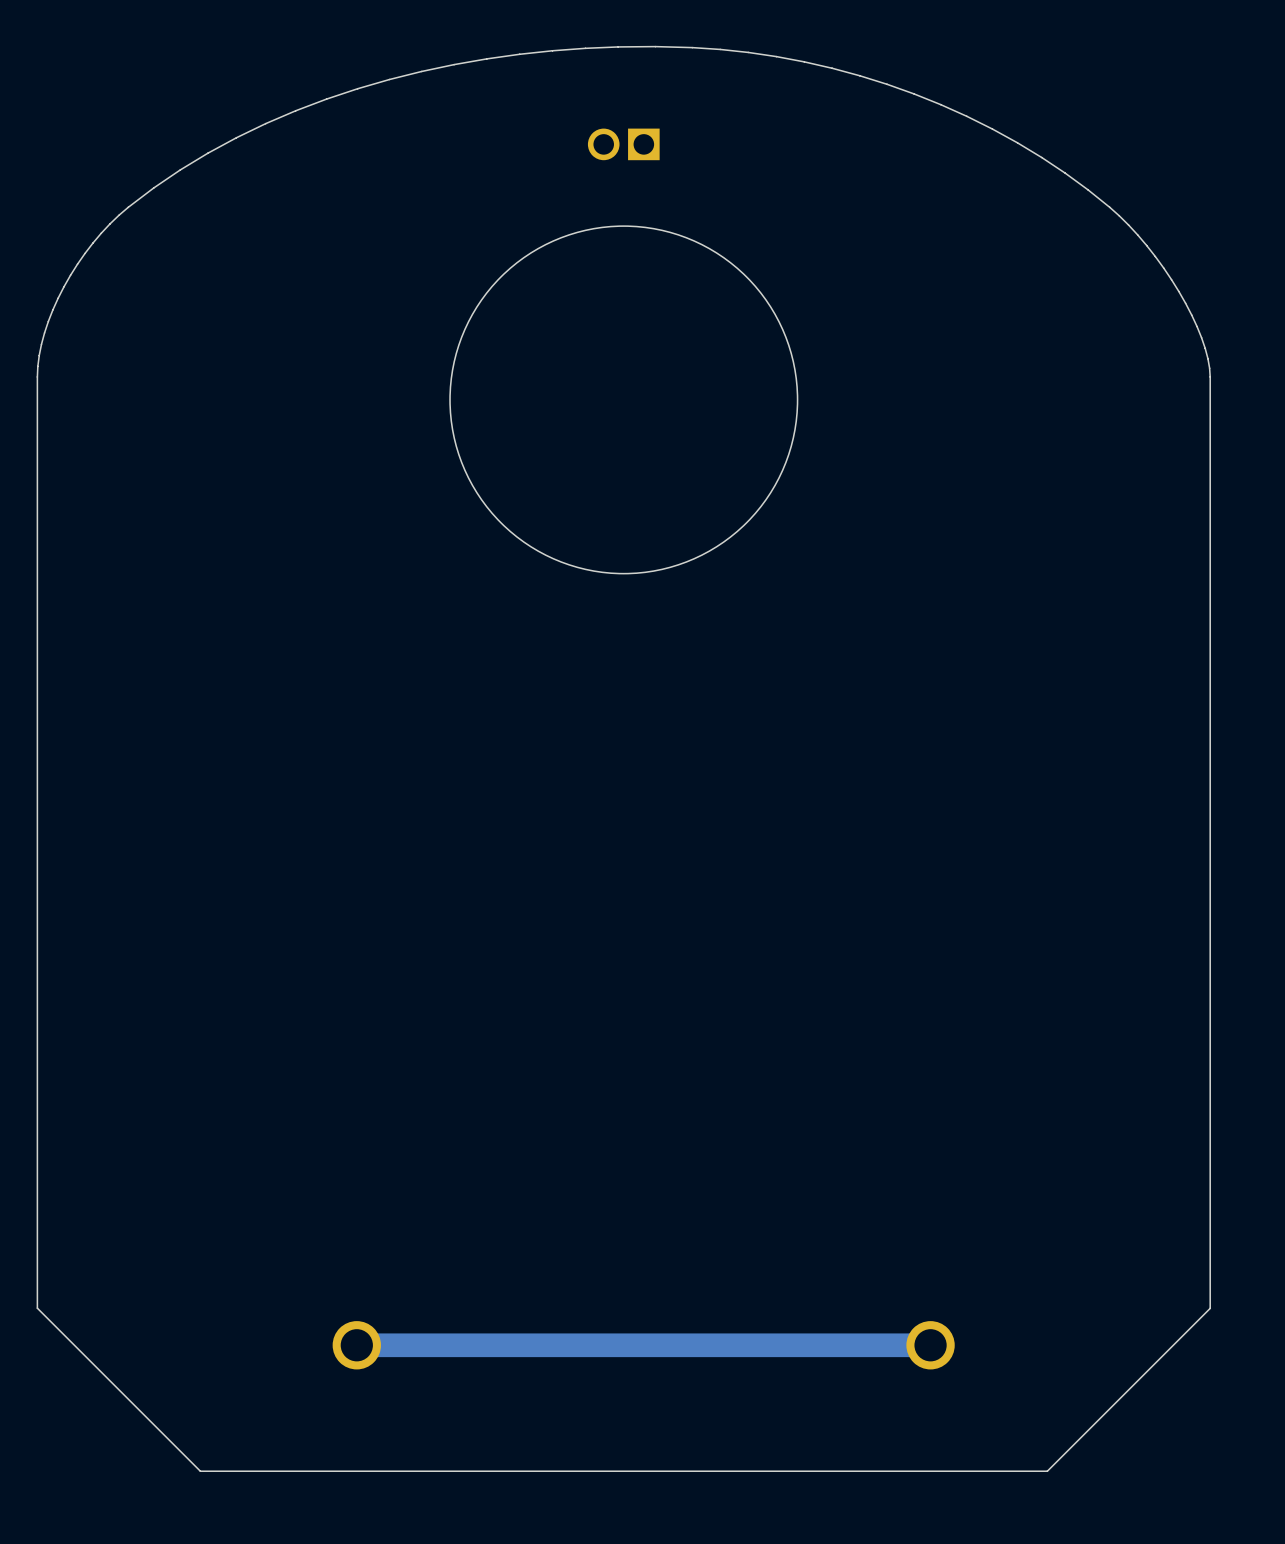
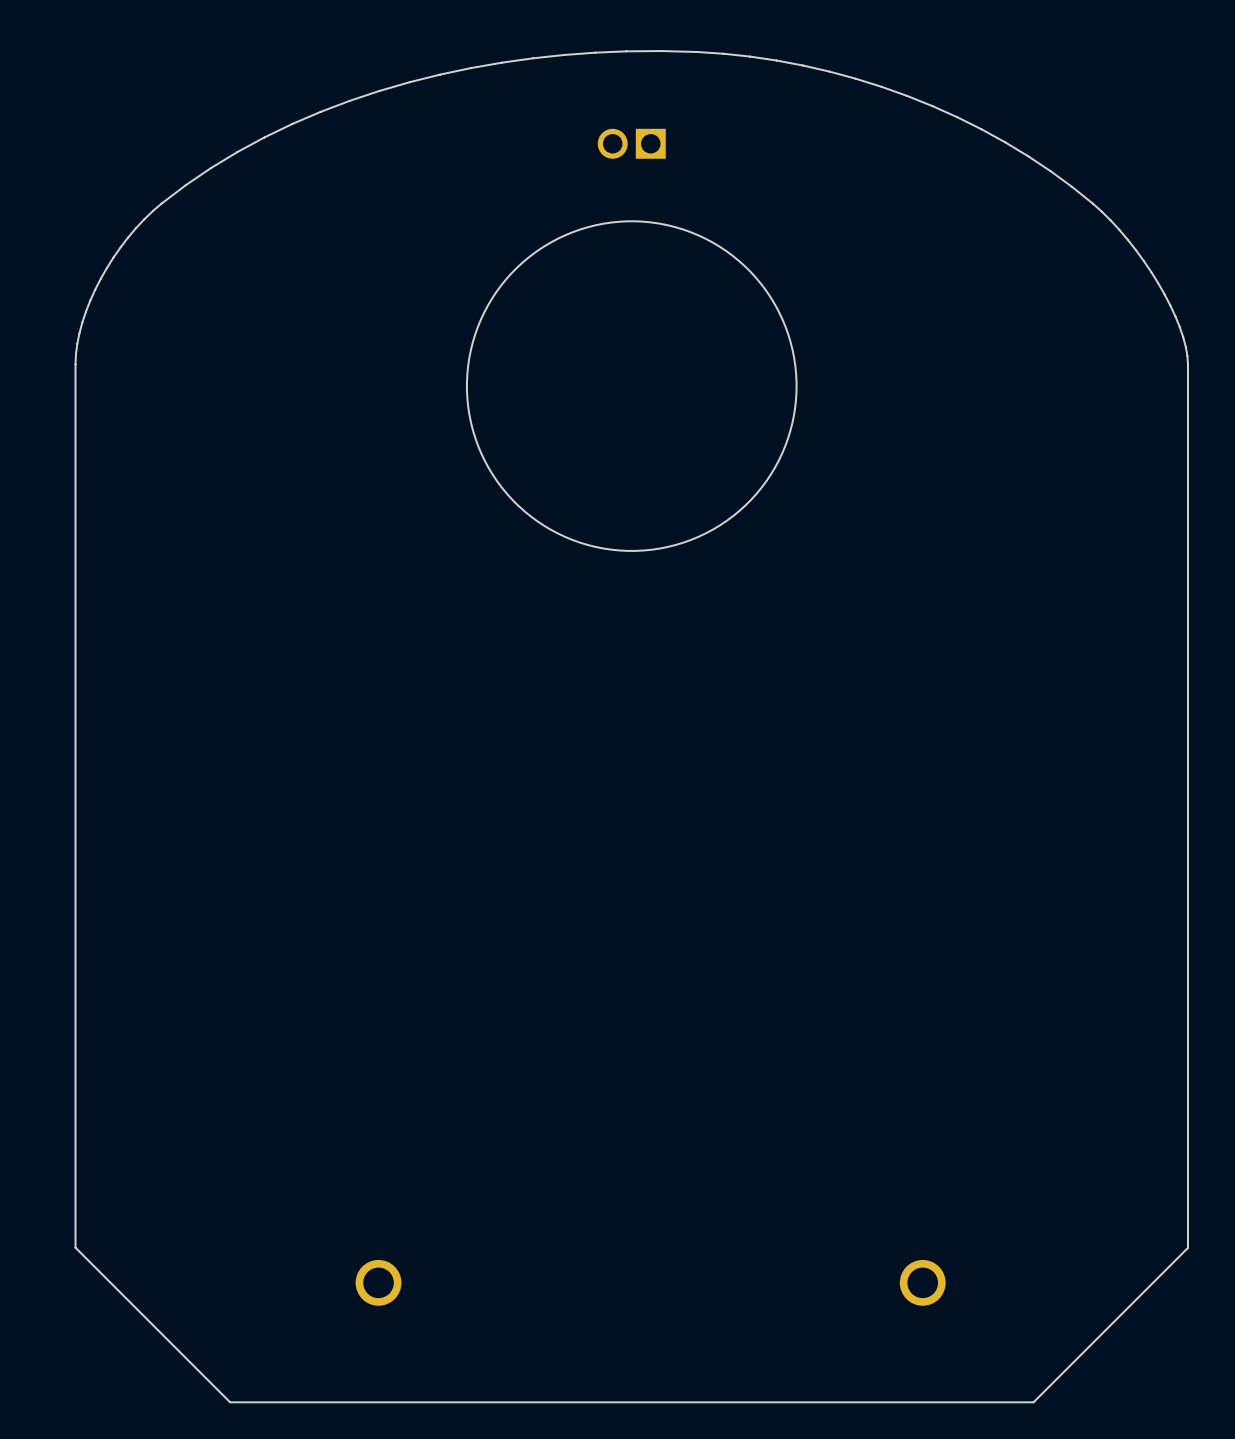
track: (930, 1345) (356, 1345) -> none

